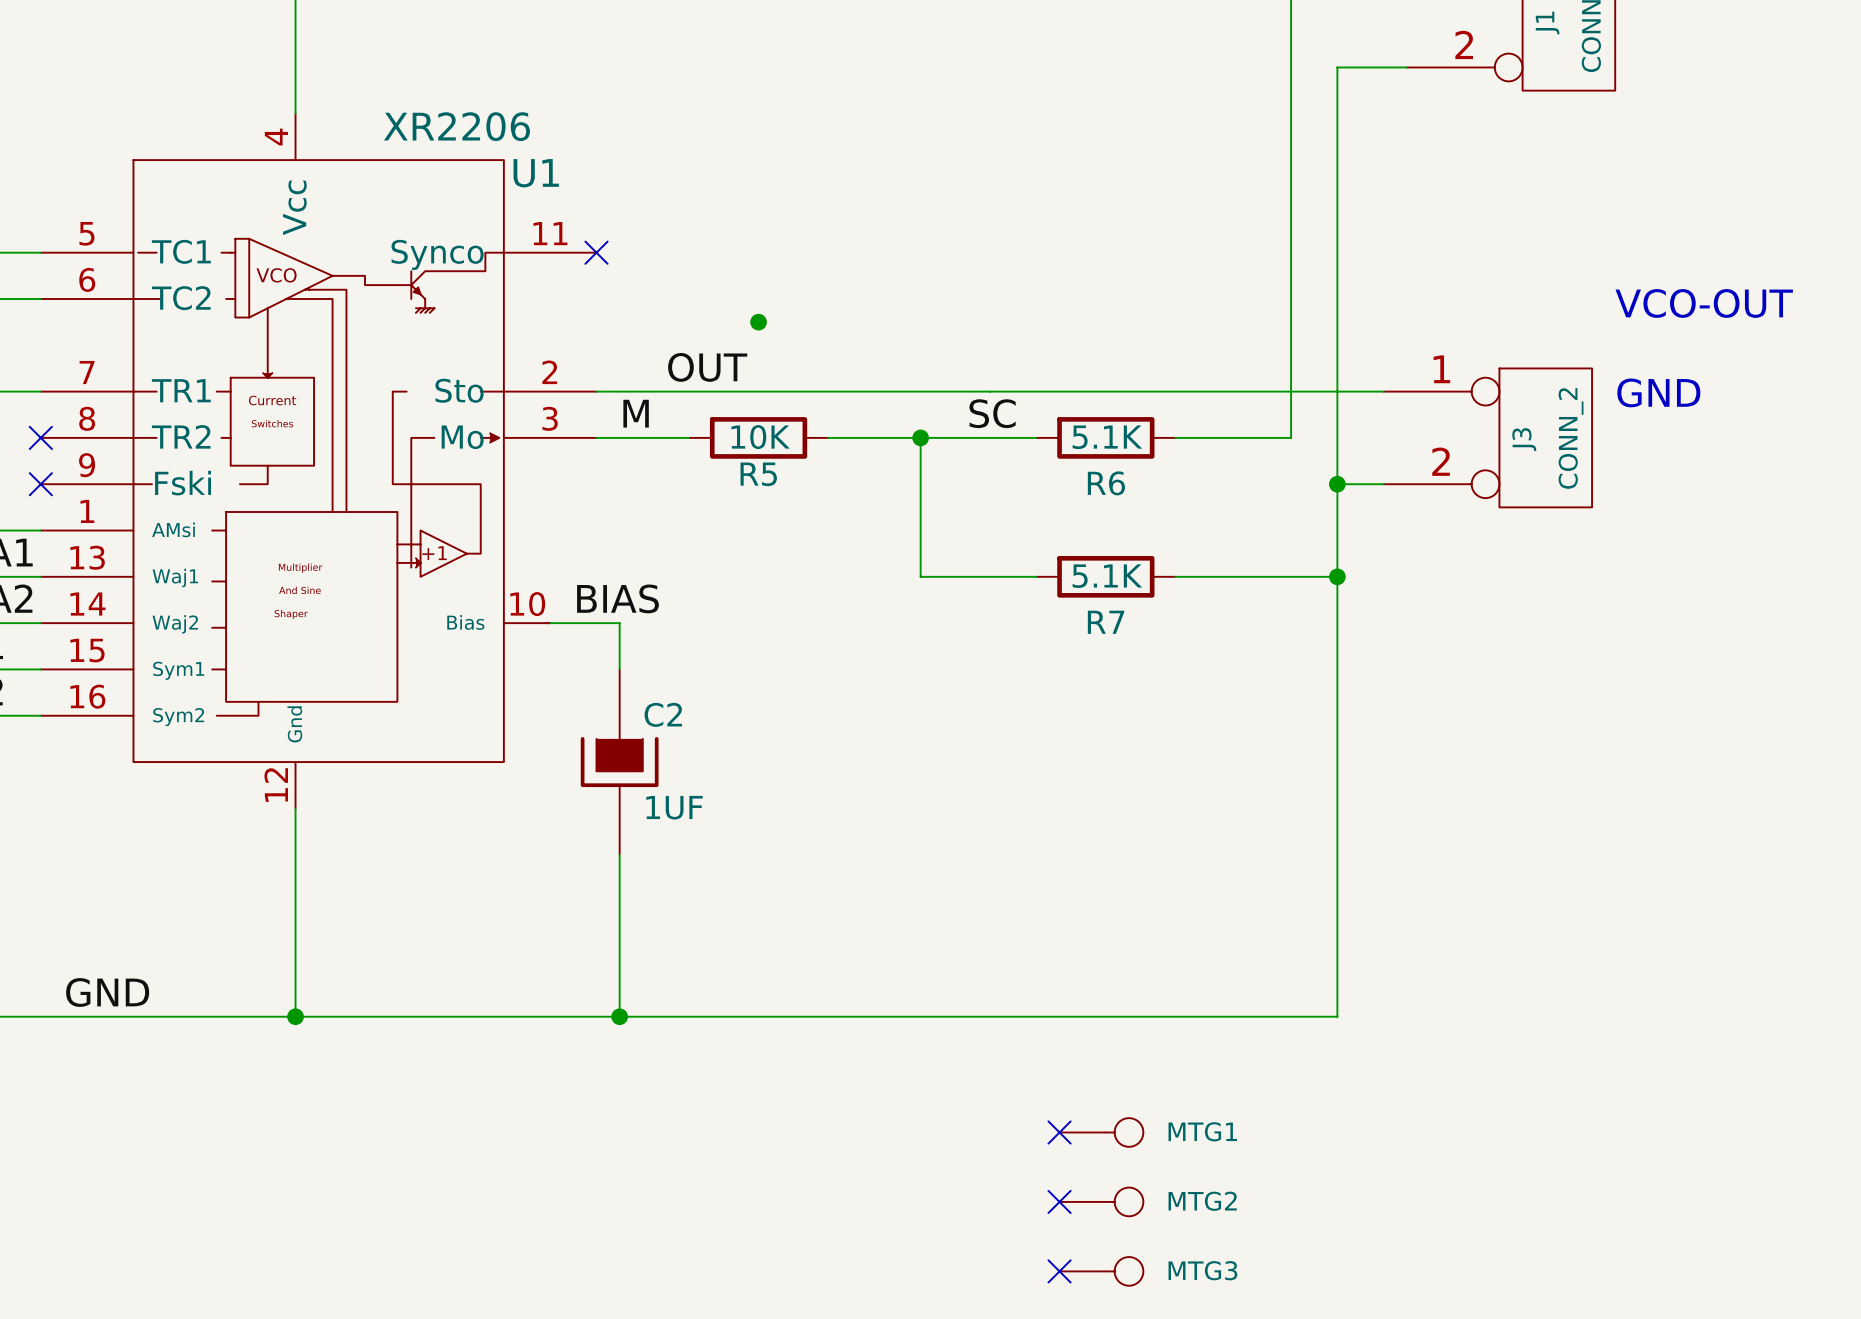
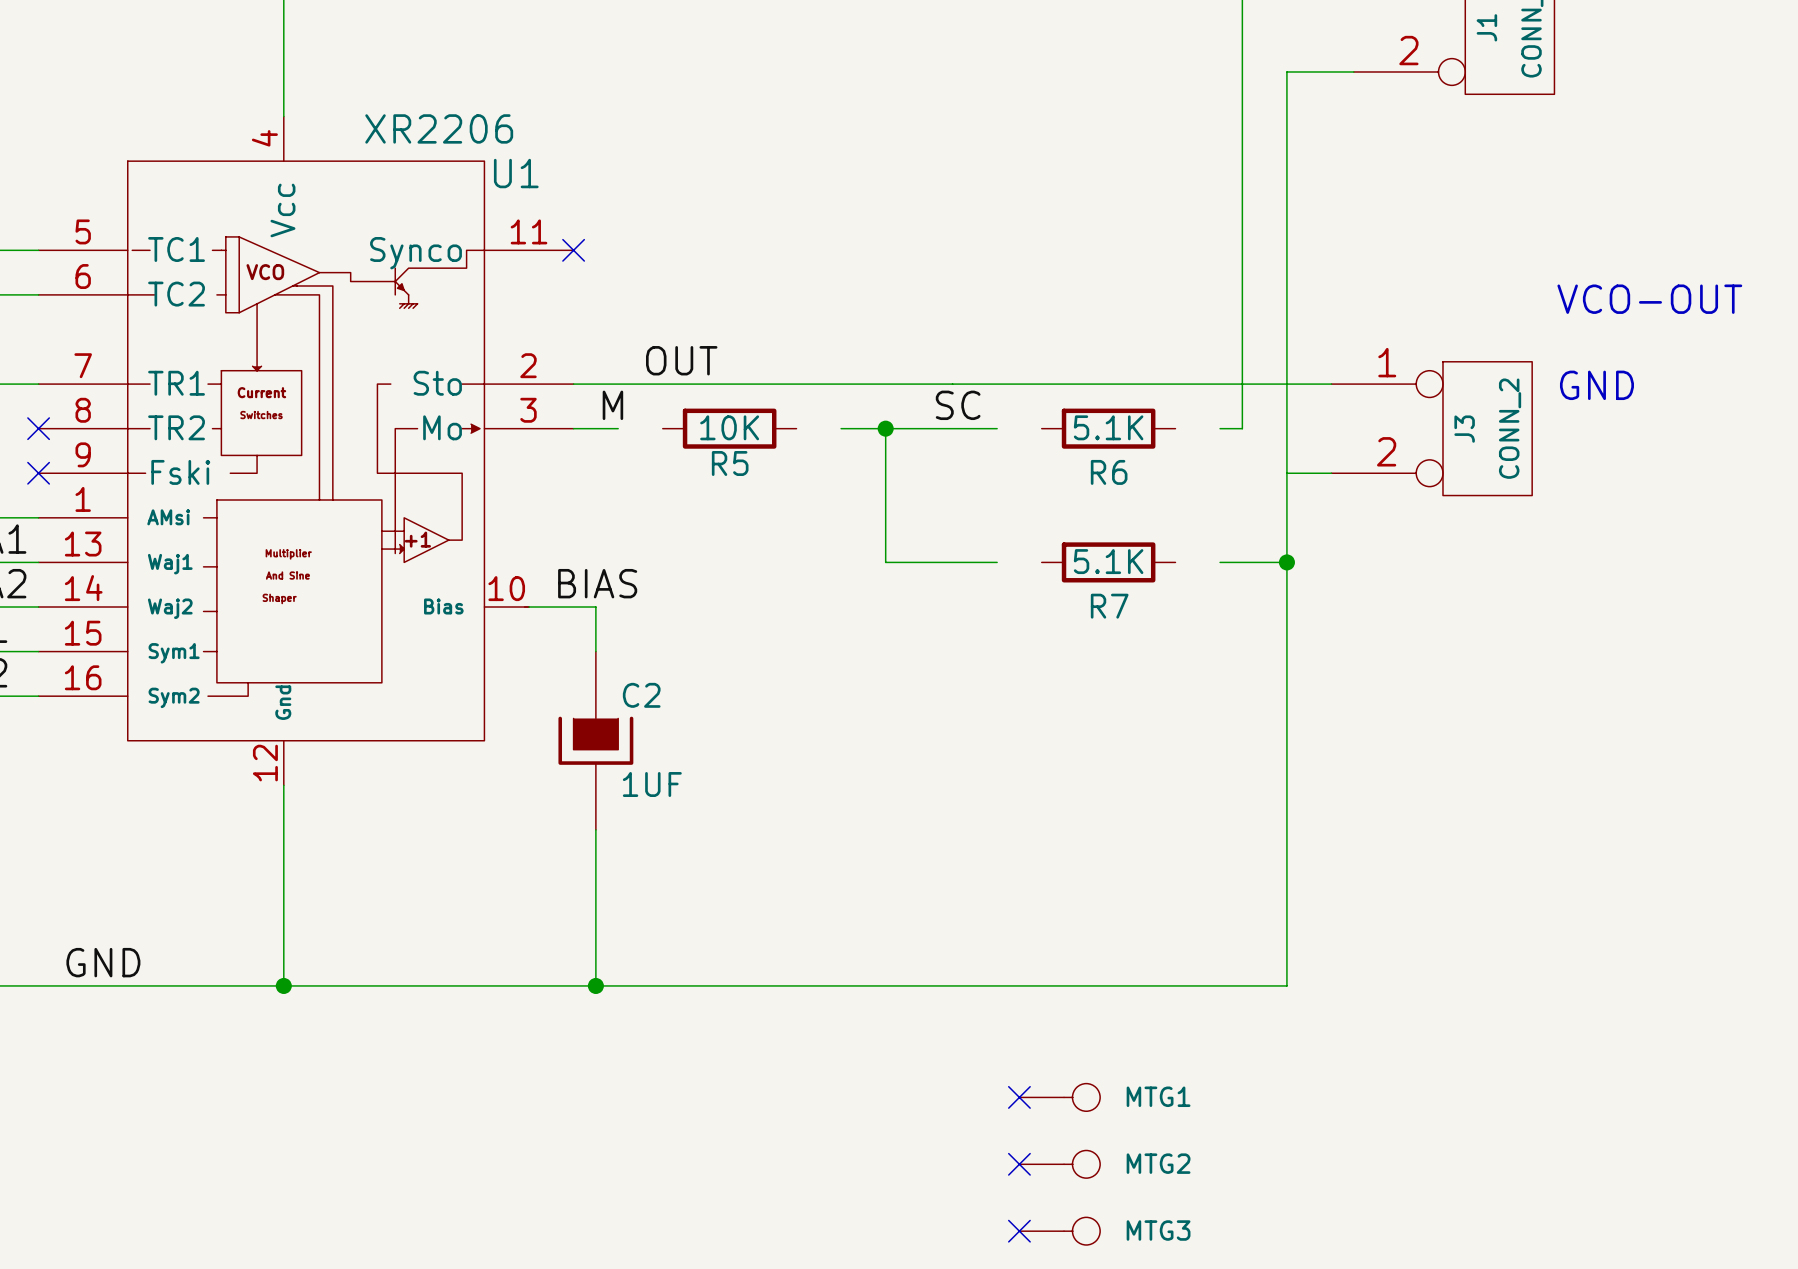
junction: (758, 322) -> none
wire: (642, 437) (689, 437) -> none
wire: (828, 437) (874, 437) -> none
R6 position: (1105, 437) -> (1108, 428)
wire: (1175, 437) (1267, 437) -> none
junction: (1337, 484) -> none
R7 position: (1105, 576) -> (1108, 562)
wire: (1175, 576) (1267, 576) -> none

